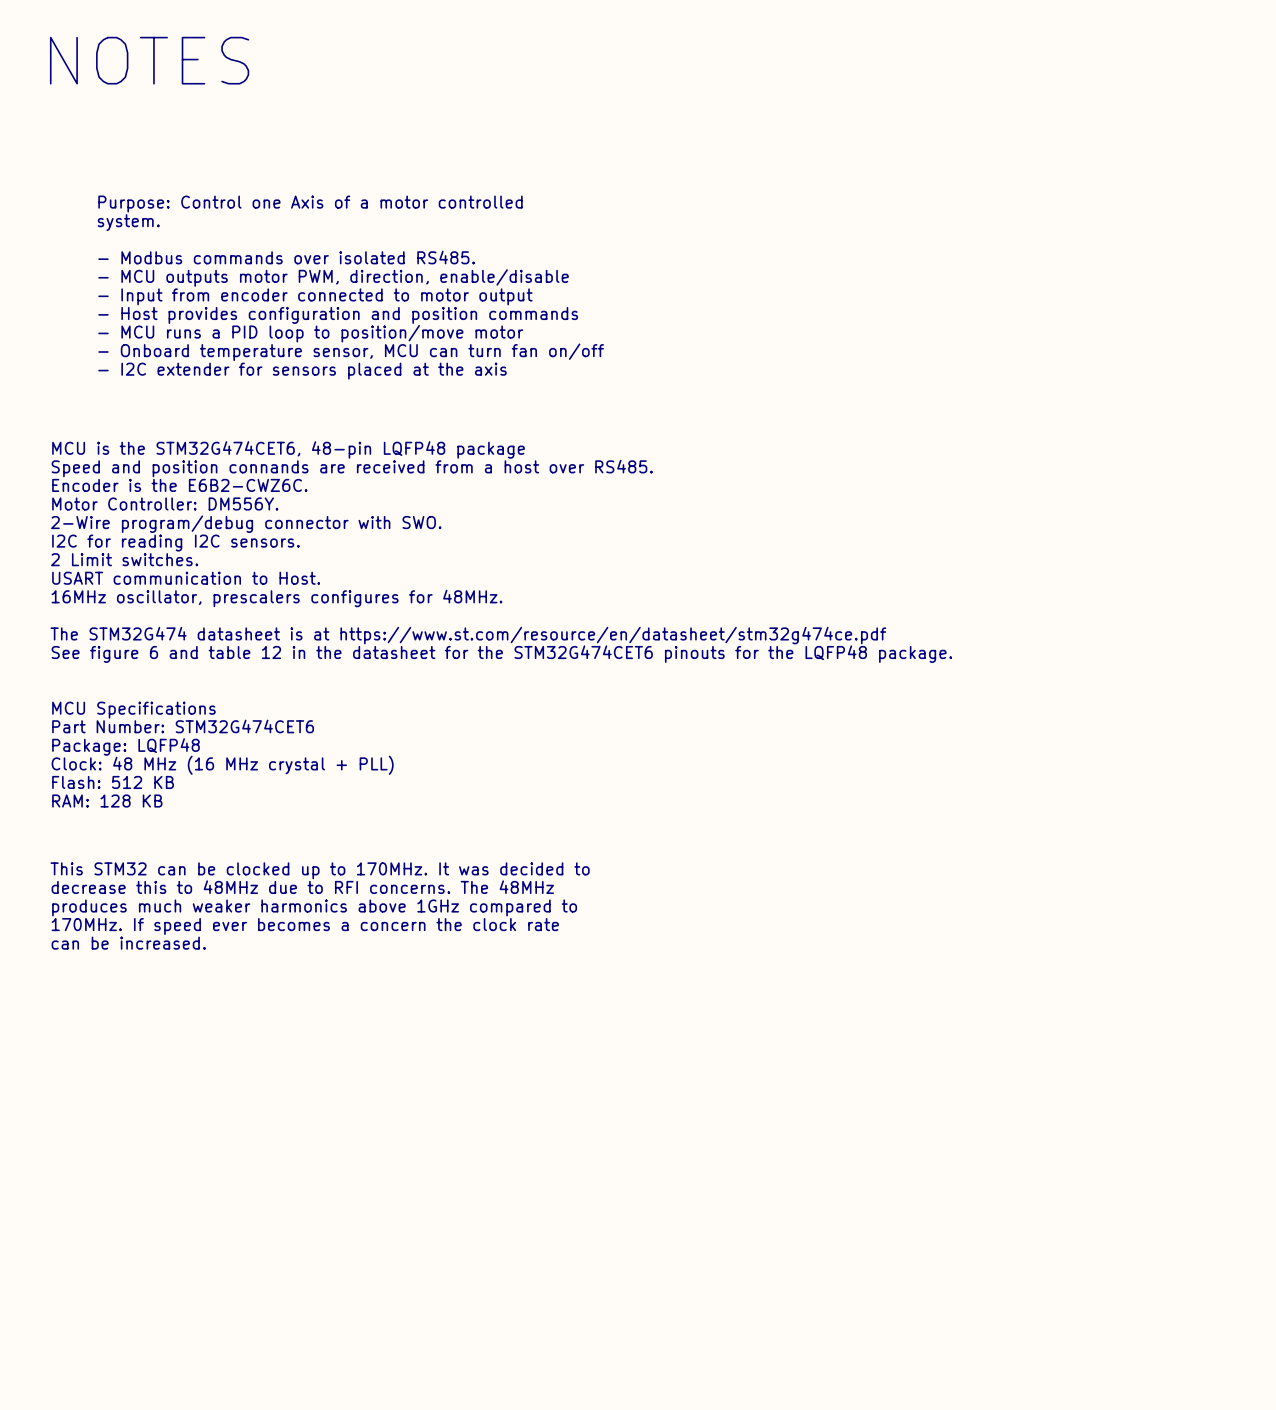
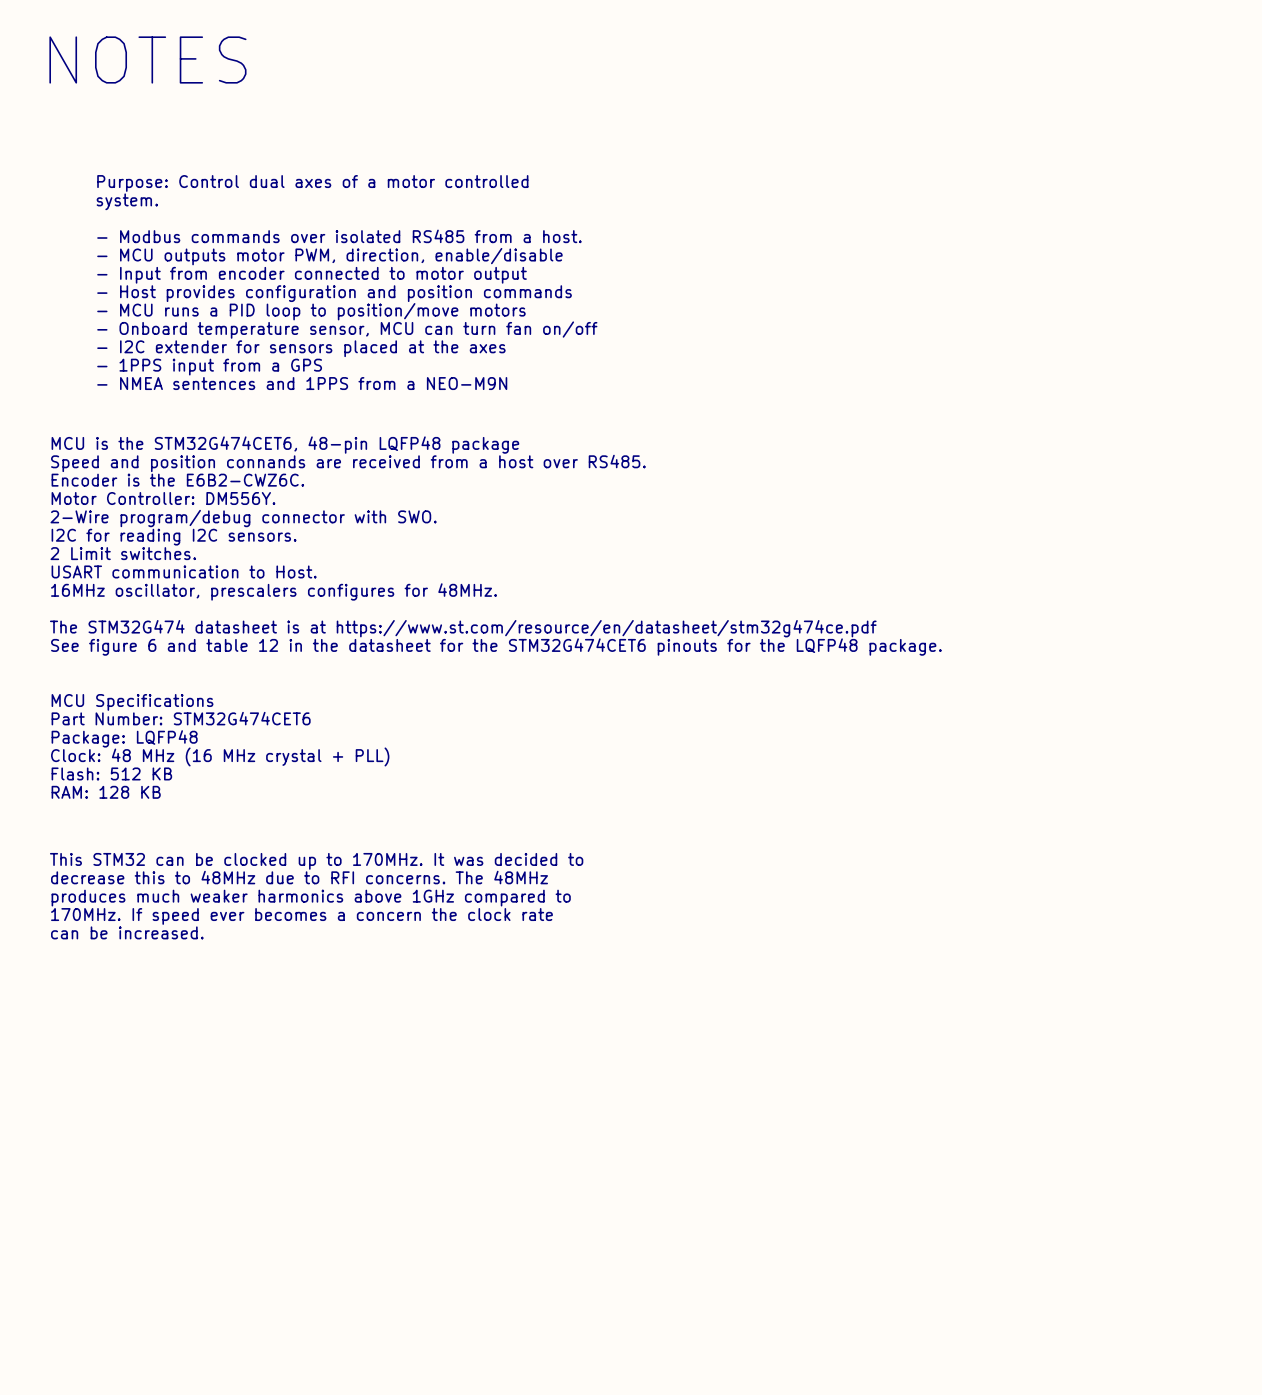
text: none -> Purpose: Control dual axes of a motor controlled (312, 183)
text: Purpose: Control one Axis of a motor controlled (310, 204) -> system. (127, 201)
text: system. (128, 222) -> none
text: none -> - Modbus commands over isolated RS485 from a host. (339, 236)
text: - Modbus commands over isolated RS485. (286, 257) -> - MCU outputs motor PWM, direction, enable/disable (329, 256)
text: - MCU outputs motor PWM, direction, enable/disable (333, 278) -> - Input from encoder connected to motor output (312, 275)
text: - Input from encoder connected to motor output (315, 296) -> - Host provides configuration and position commands (334, 293)
text: - Host provides configuration and position commands (338, 315) -> - MCU runs a PID loop to position/move motors (311, 311)
text: - MCU runs a PID loop to position/move motor (310, 333) -> - Onboard temperature sensor, MCU can turn fan on/off (347, 330)
text: - Onboard temperature sensor, MCU can turn fan on/off (351, 352) -> - I2C extender for sensors placed at the axes (301, 348)
text: - I2C extender for sensors placed at the axis (302, 371) -> - 1PPS input from a GPS (209, 367)
text: none -> - NMEA sentences and 1PPS from a NEO-M9N (302, 383)

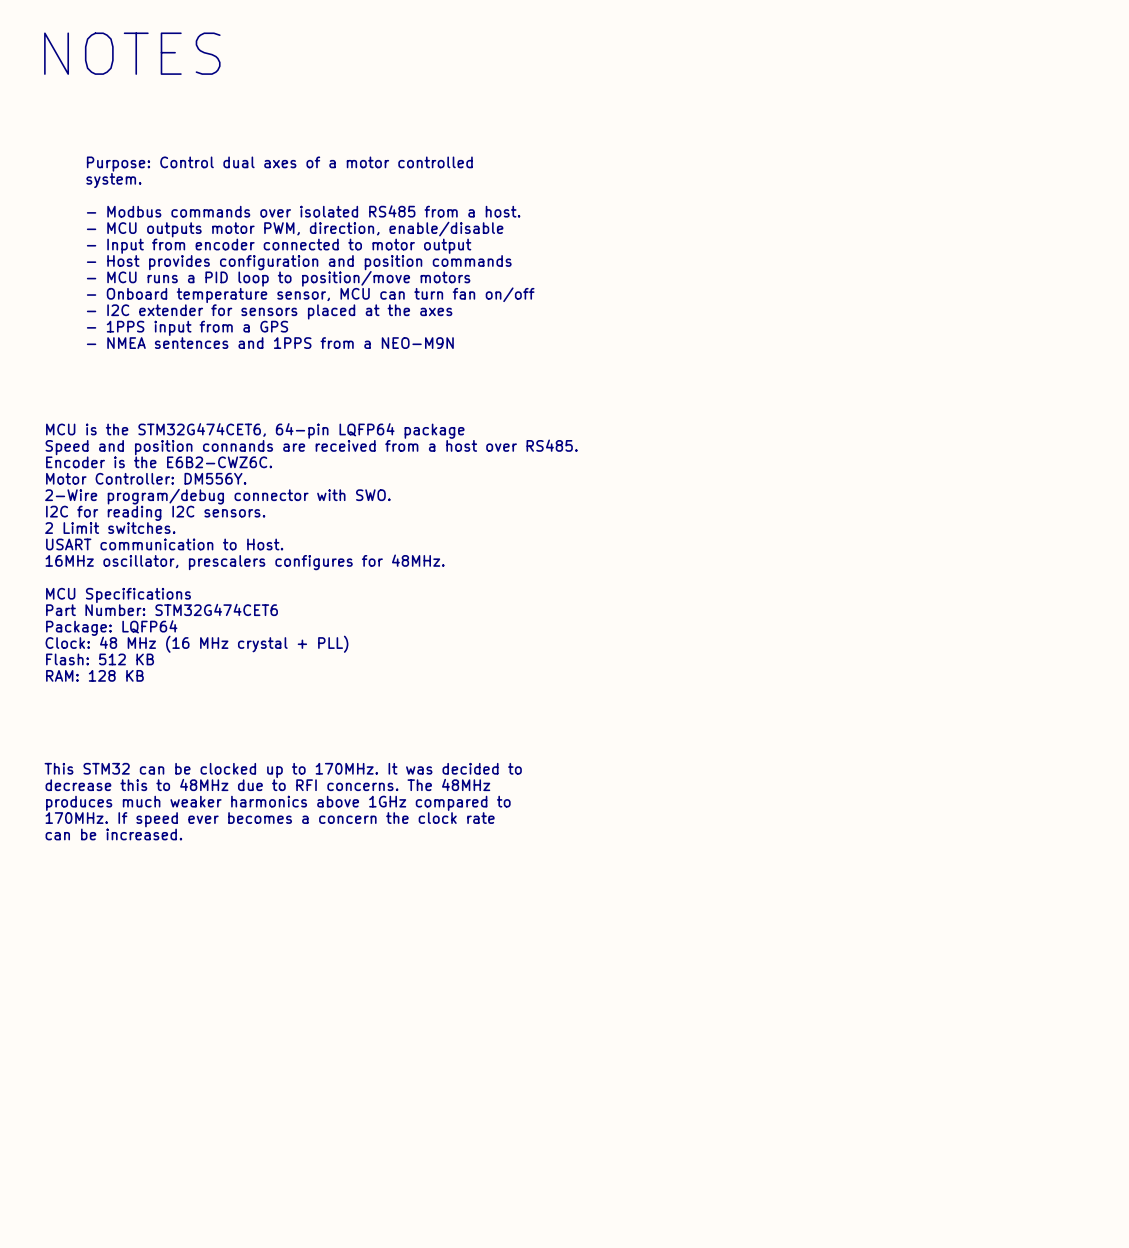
text: MCU is the STM32G474CET6, 48-pin LQFP48 package (285, 445) -> none
text: Speed and position connands are received from a host over RS485. (348, 463) -> none
text: Encoder is the E6B2-CWZ6C. (177, 480) -> MCU is the STM32G474CET6, 64-pin LQFP64 package (255, 430)
text: Motor Controller: DM556Y. (163, 498) -> Speed and position connands are received from a host over RS485. (311, 447)
text: 2-Wire program/debug connector with SWO. (243, 518) -> Encoder is the E6B2-CWZ6C. (159, 462)
text: I2C for reading I2C sensors. (174, 537) -> Motor Controller: DM556Y. (146, 478)
text: 2 Limit switches. (123, 553) -> 2-Wire program/debug connector with SWO. (217, 496)
text: USART communication to Host. (184, 571) -> I2C for reading I2C sensors. (155, 513)
text: 16MHz oscillator, prescalers configures for 48MHz. (273, 591) -> 2 Limit switches. (110, 528)
text: none -> USART communication to Host. (164, 544)
text: The STM32G474 datasheet is at https://www.st.com/resource/en/datasheet/stm32g474ce.pdf (463, 628) -> 16MHz oscillator, prescalers configures for 48MHz. (245, 562)
text: See figure 6 and table 12 in the datasheet for the STM32G474CET6 pinouts for the LQFP48 package. (496, 647) -> none
text: none -> MCU Specifications (118, 595)
text: none -> Part Number: STM32G474CET6 (162, 609)
text: MCU Specifications (132, 702) -> Package: LQFP64 (111, 628)
text: Part Number: STM32G474CET6 (181, 718) -> Clock: 48 MHz (16 MHz crystal + PLL) (196, 644)
text: Package: LQFP48 (124, 738) -> Flash: 512 KB (100, 659)
text: Clock: 48 MHz (16 MHz crystal + PLL) (220, 756) -> RAM: 128 KB (94, 675)
text: Flash: 512 KB (111, 773) -> none
text: RAM: 128 KB (106, 792) -> none

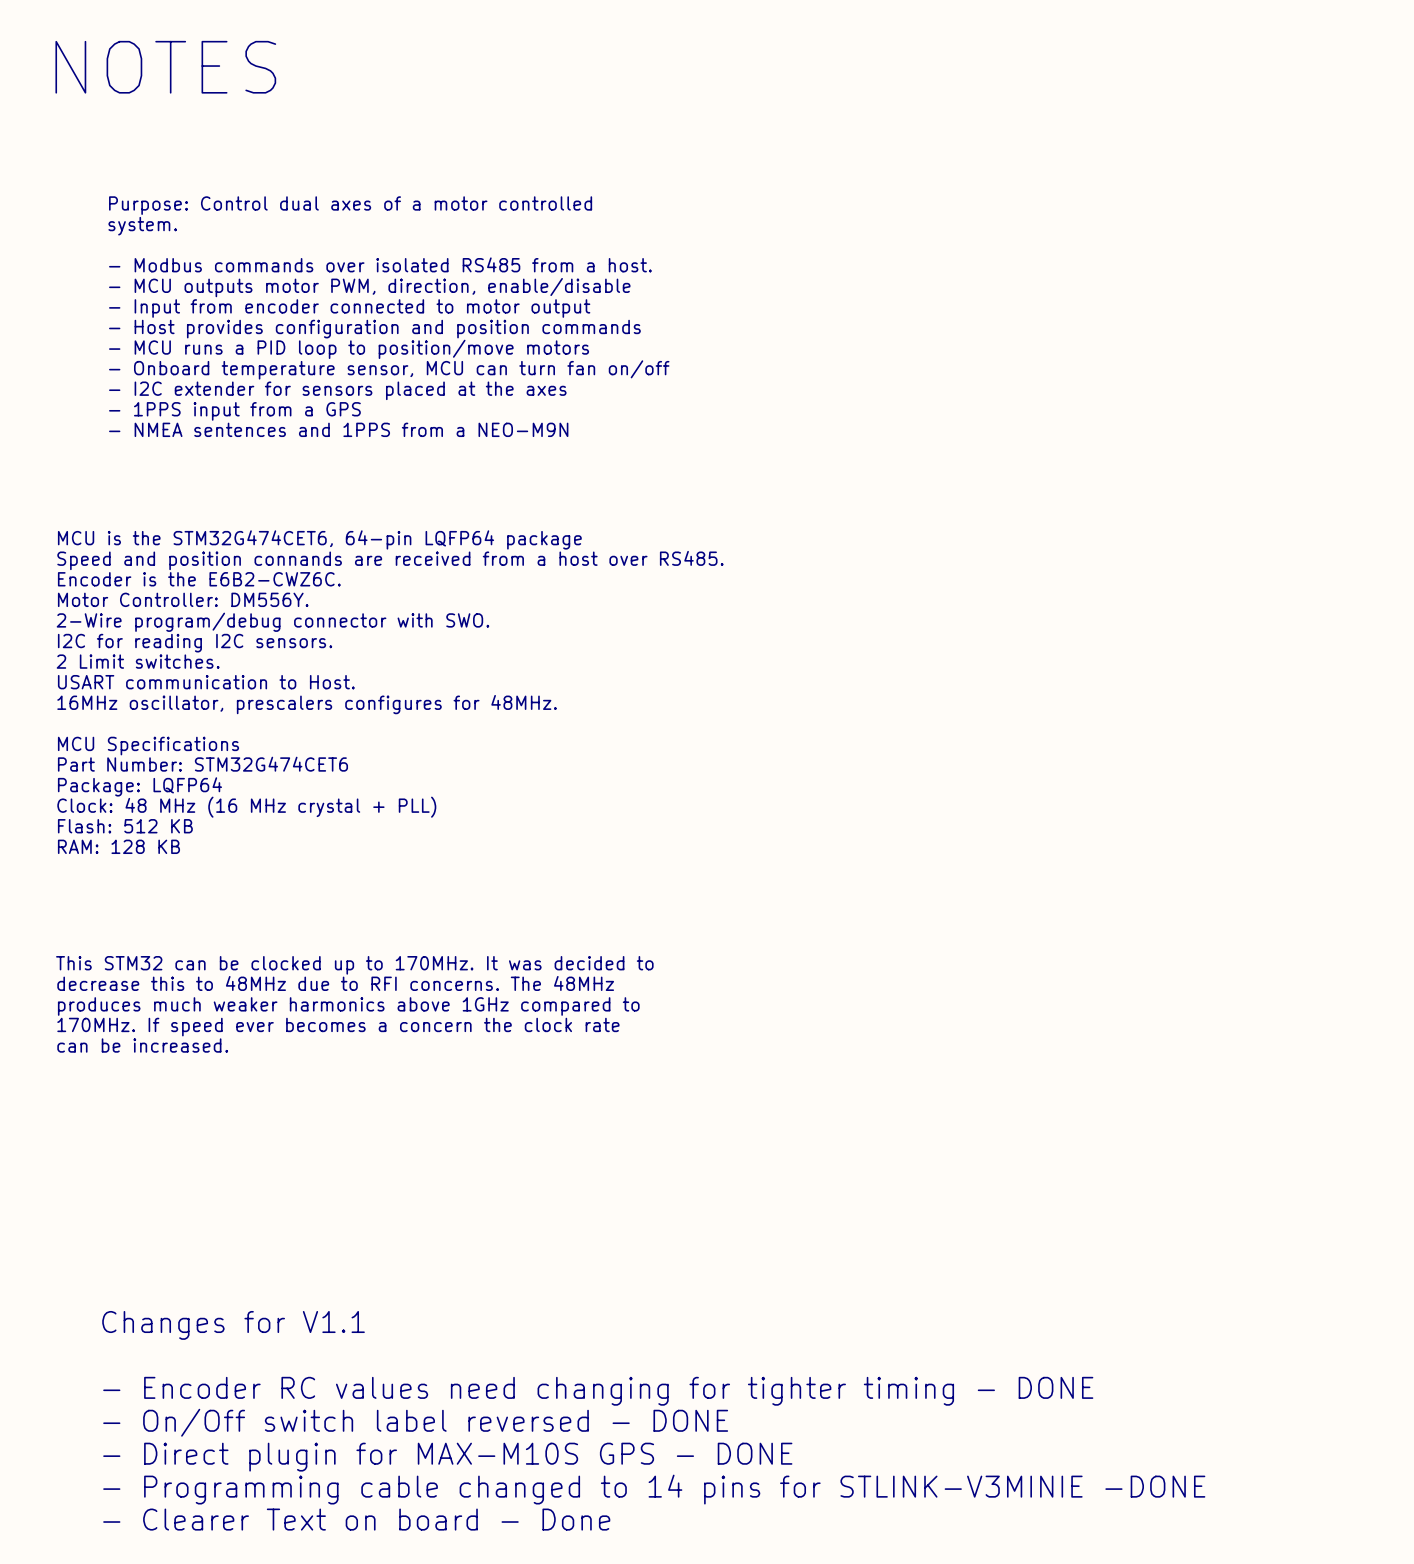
text: none -> Changes for V1.1 (233, 1325)
text: none -> - Encoder RC values need changing for tighter timing - DONE (598, 1391)
text: none -> - On/Off switch label reversed - DONE (415, 1422)
text: none -> - Direct plugin for MAX-M10S GPS - DONE (447, 1457)
text: none -> - Programming cable changed to 14 pins for STLINK-V3MINIE -DONE (654, 1489)
text: none -> - Clearer Text on board - Done (356, 1519)

